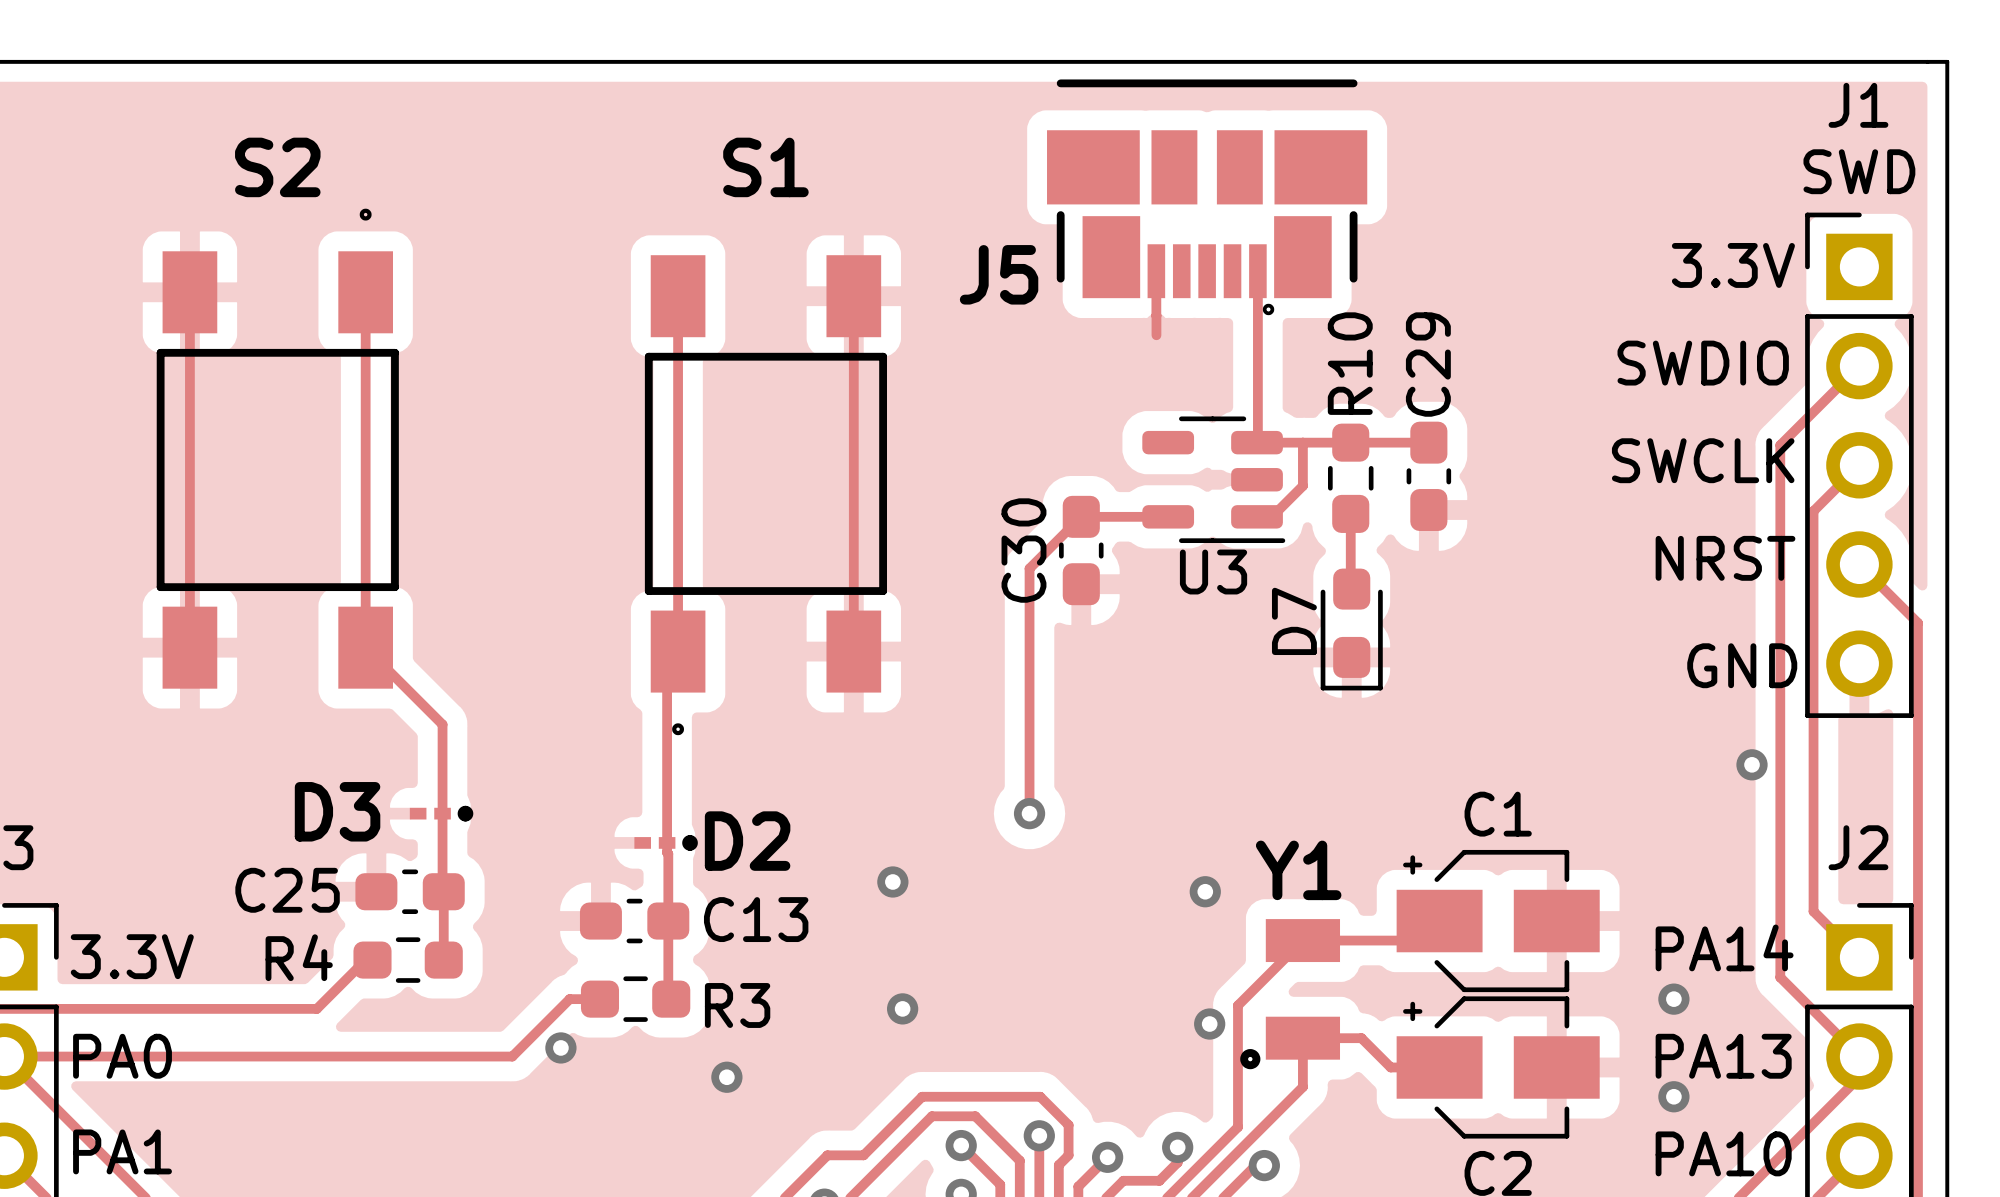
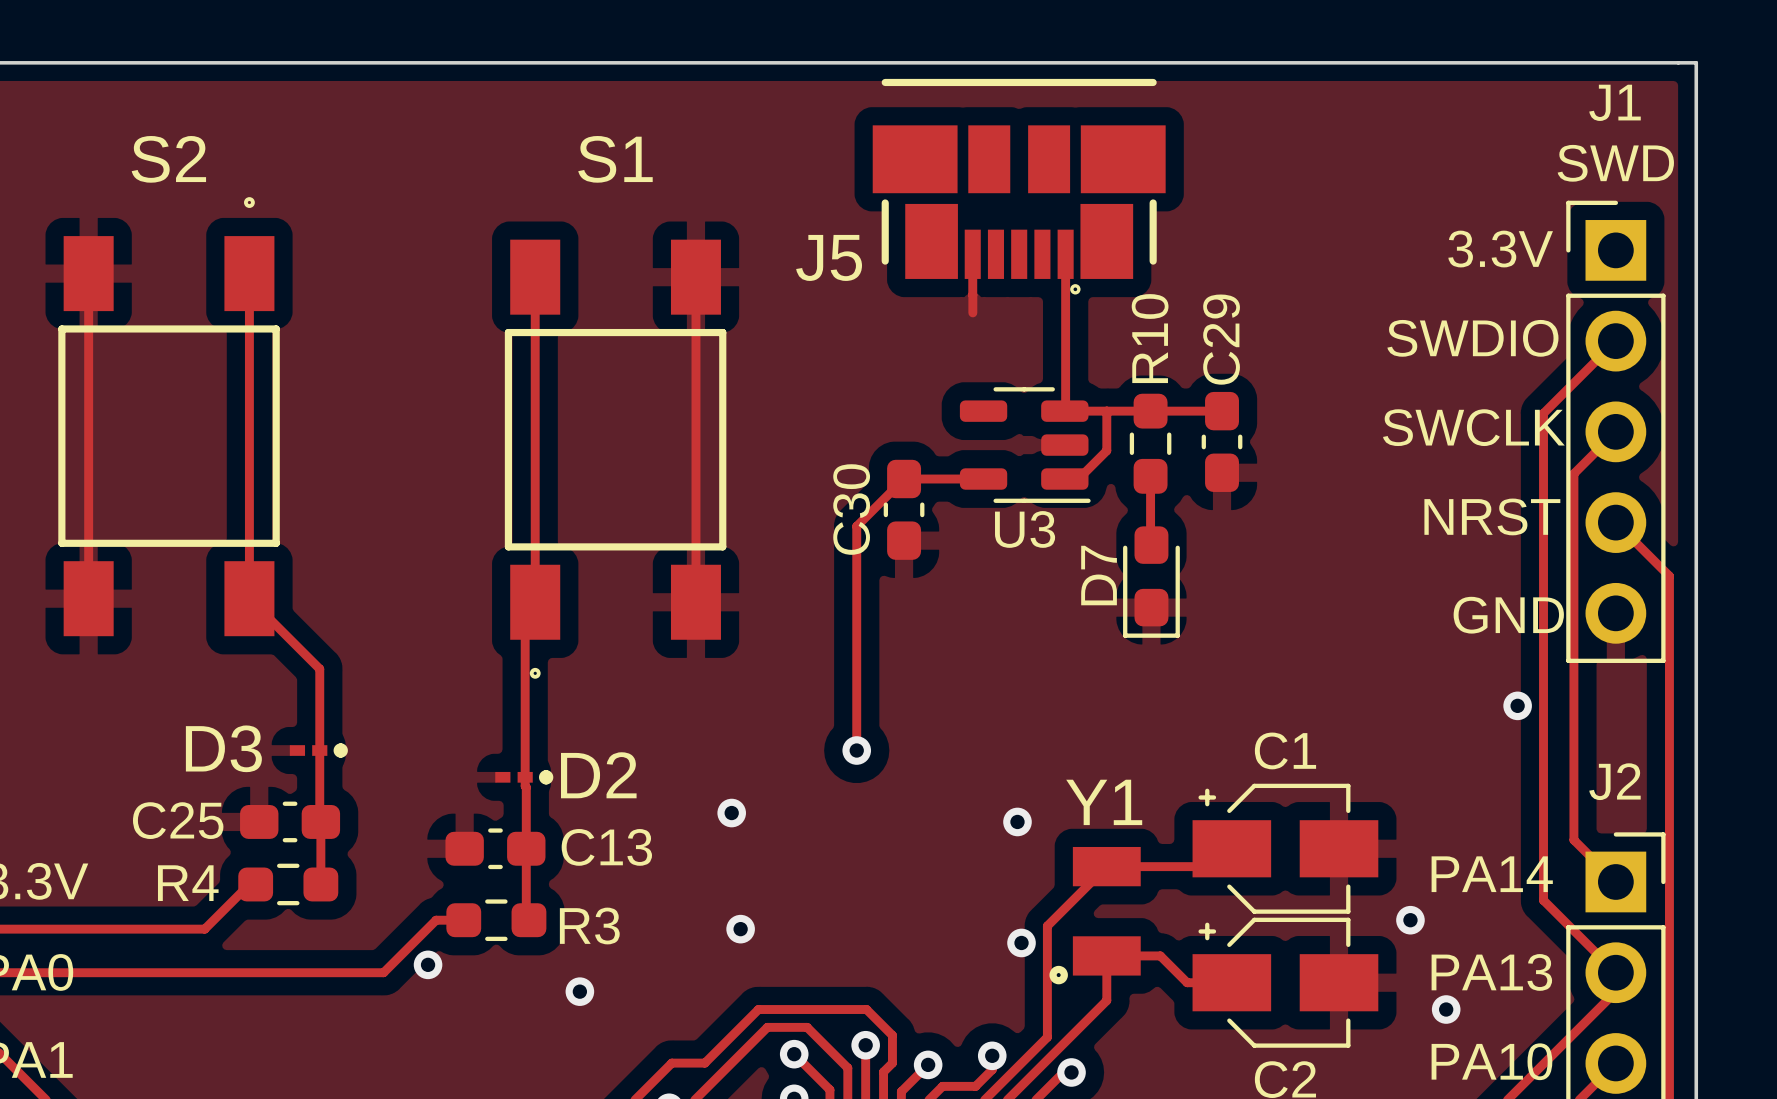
via position: (1673, 999) -> (1410, 920)

